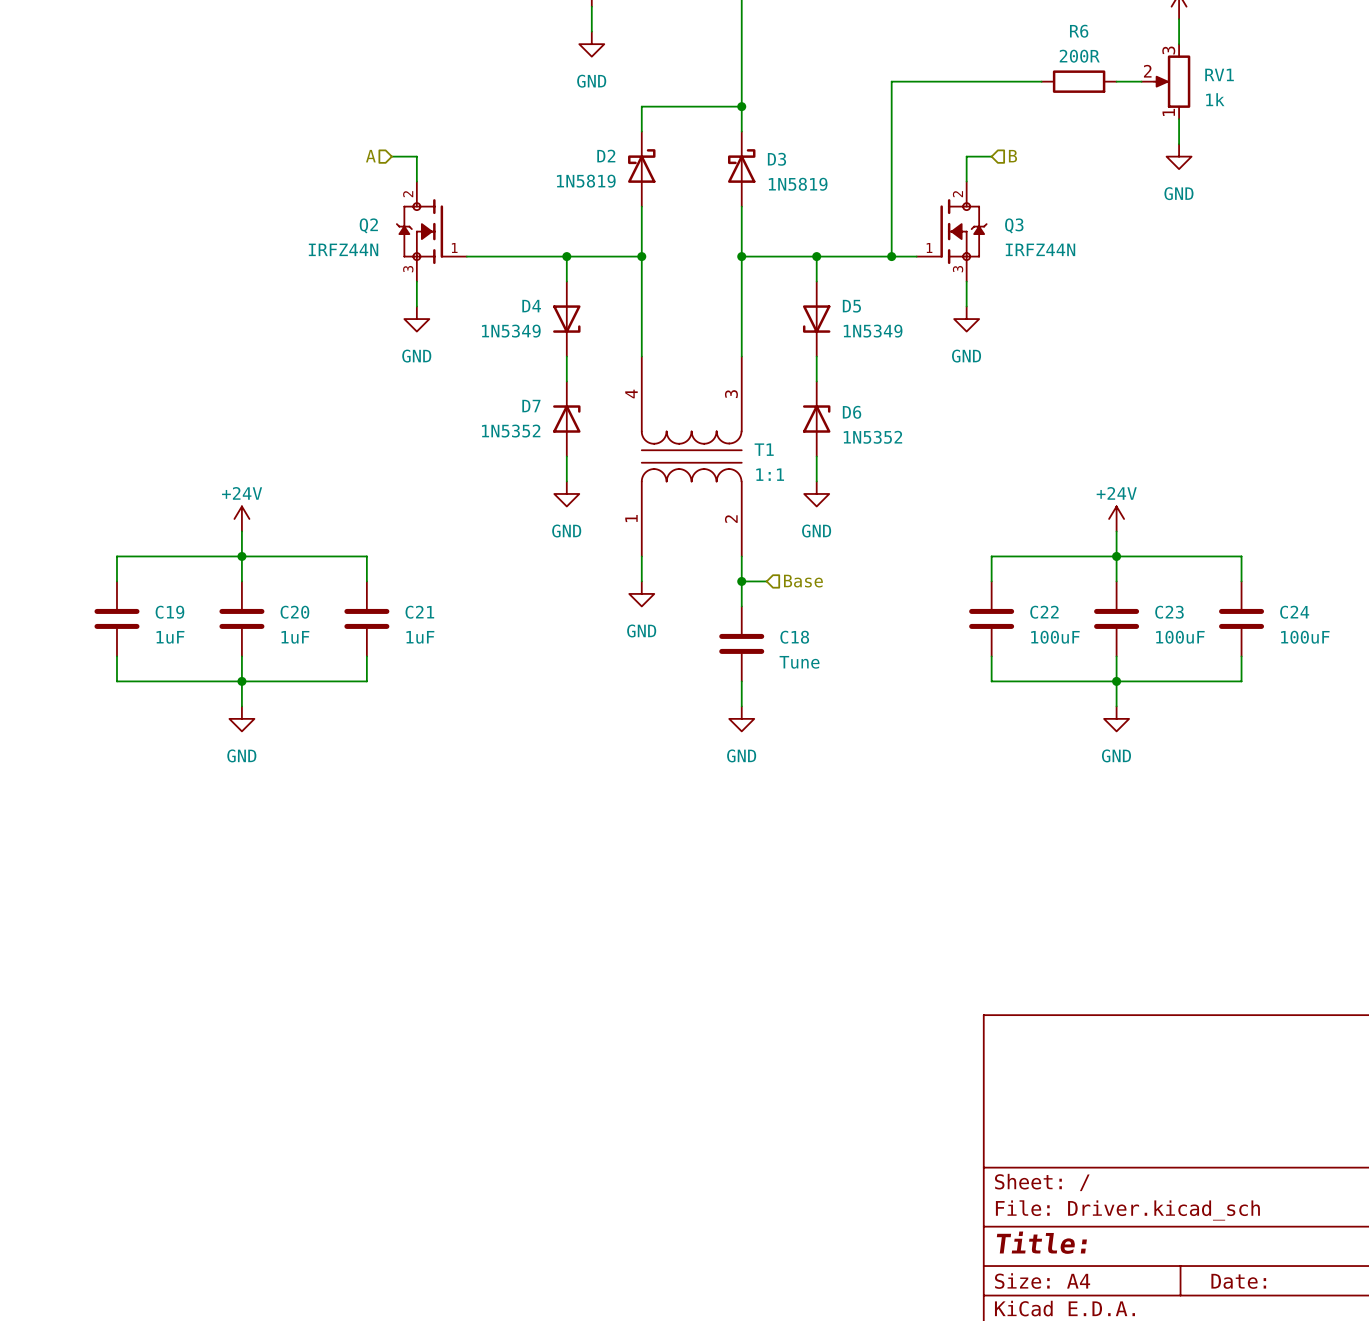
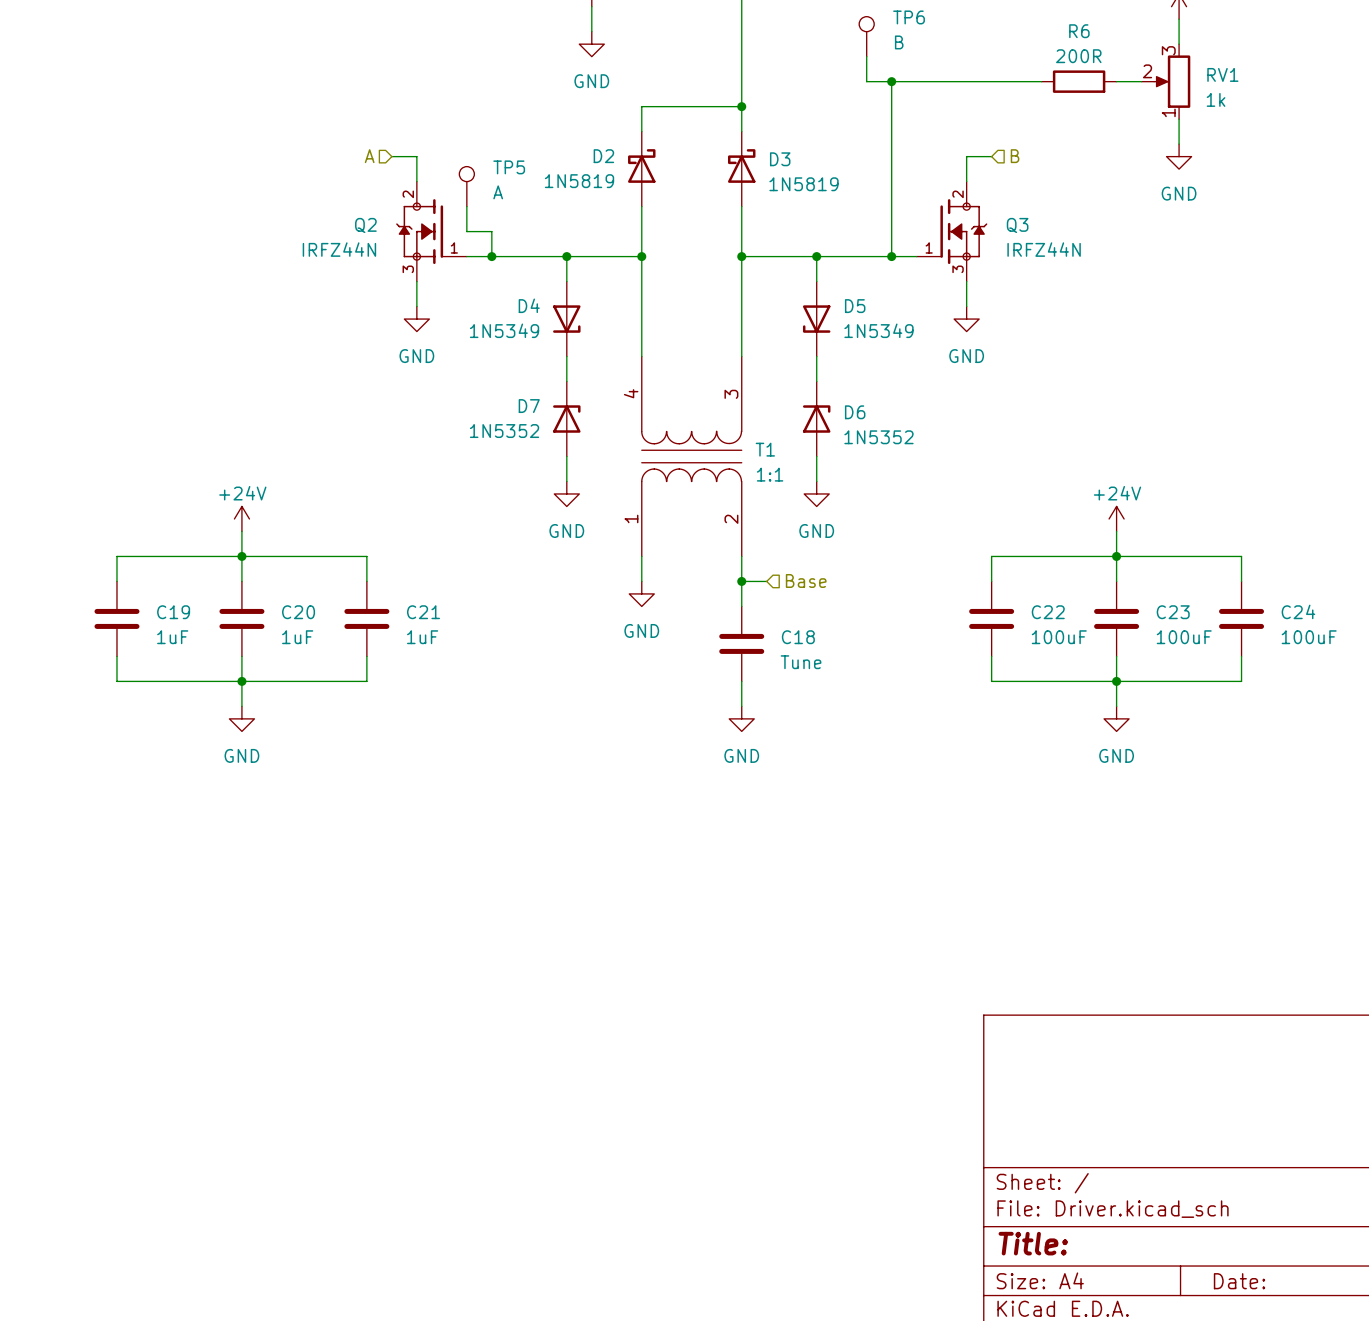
TP6: none -> B (866, 36)
wire: none -> (866, 56) (866, 81) (891, 81)
junction: none -> (891, 81)
TP5: none -> A (466, 186)
wire: none -> (466, 206) (466, 231) (491, 231) (491, 256)
junction: none -> (491, 256)

